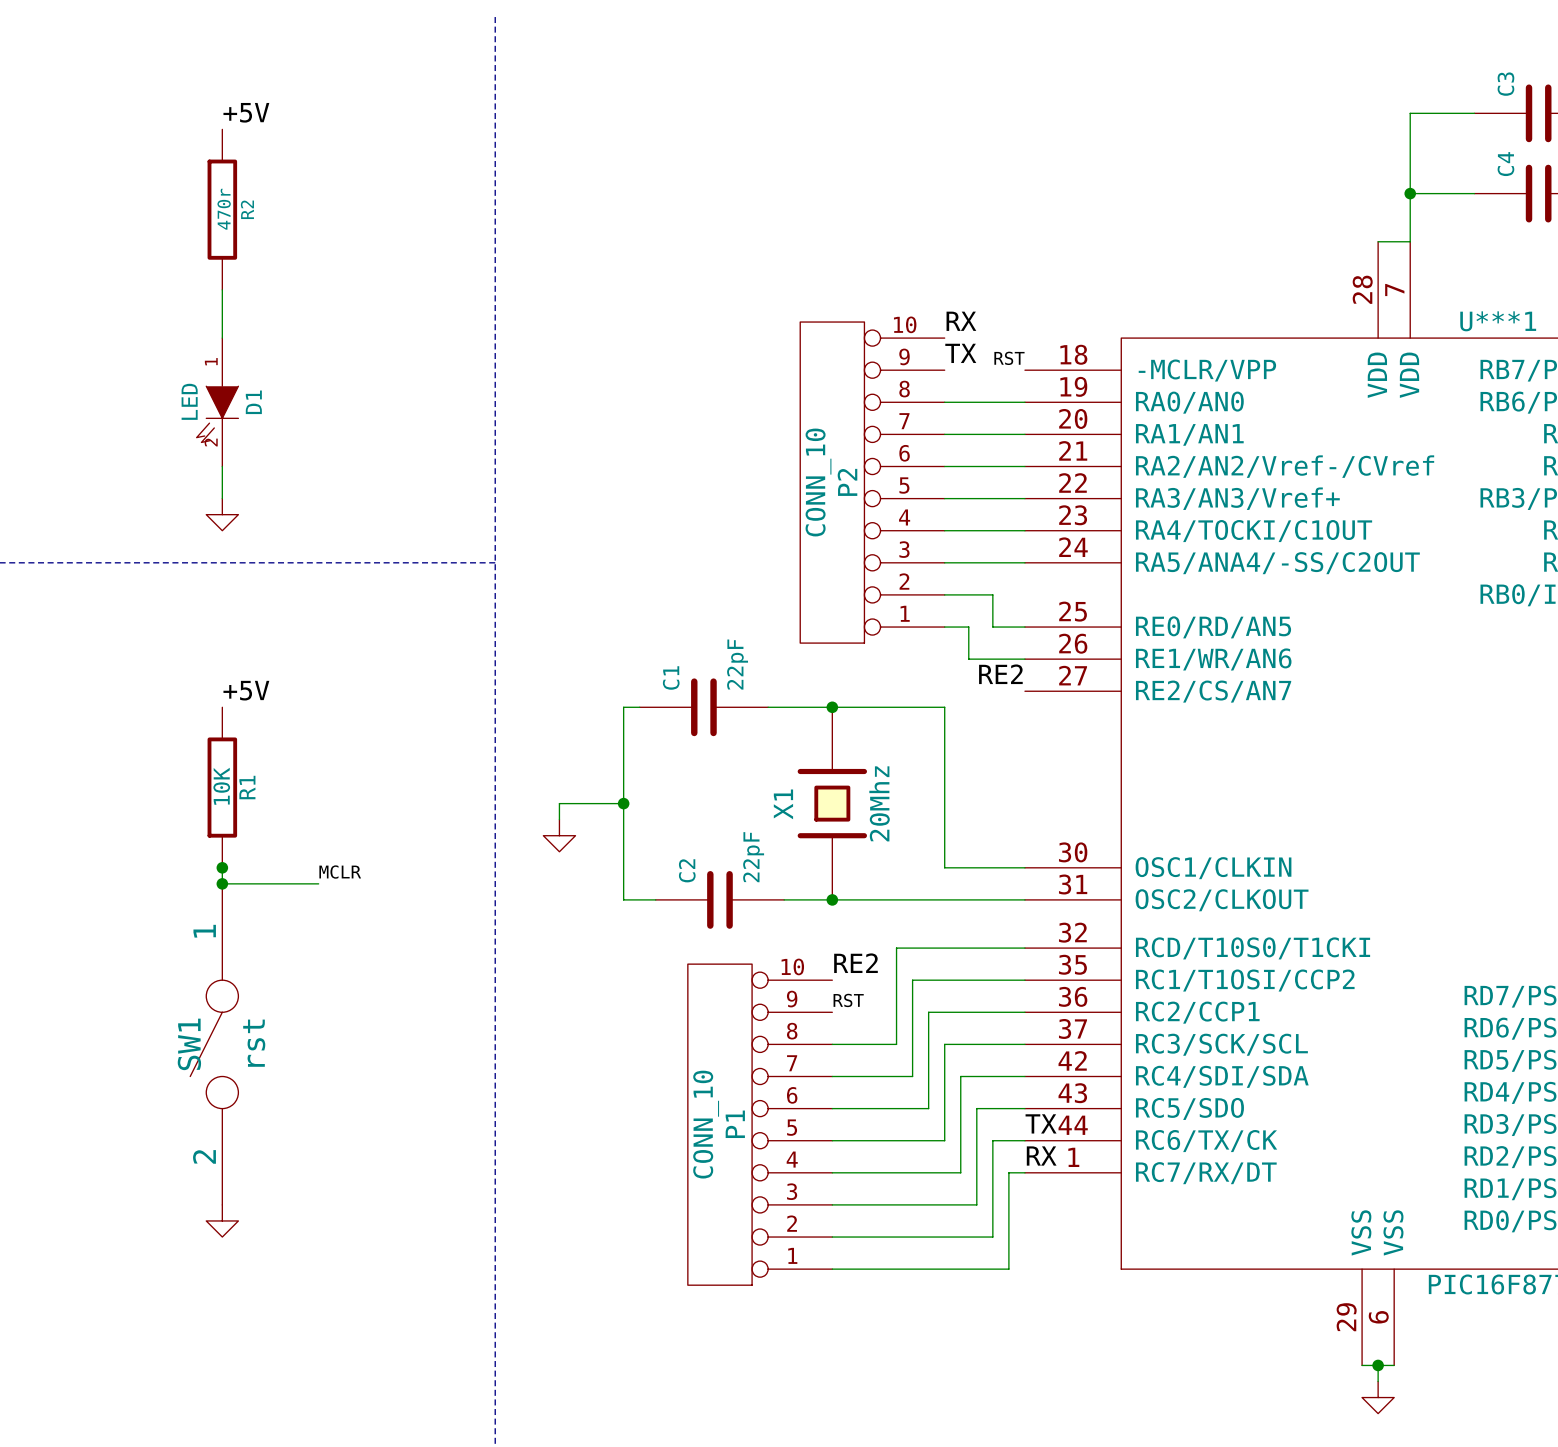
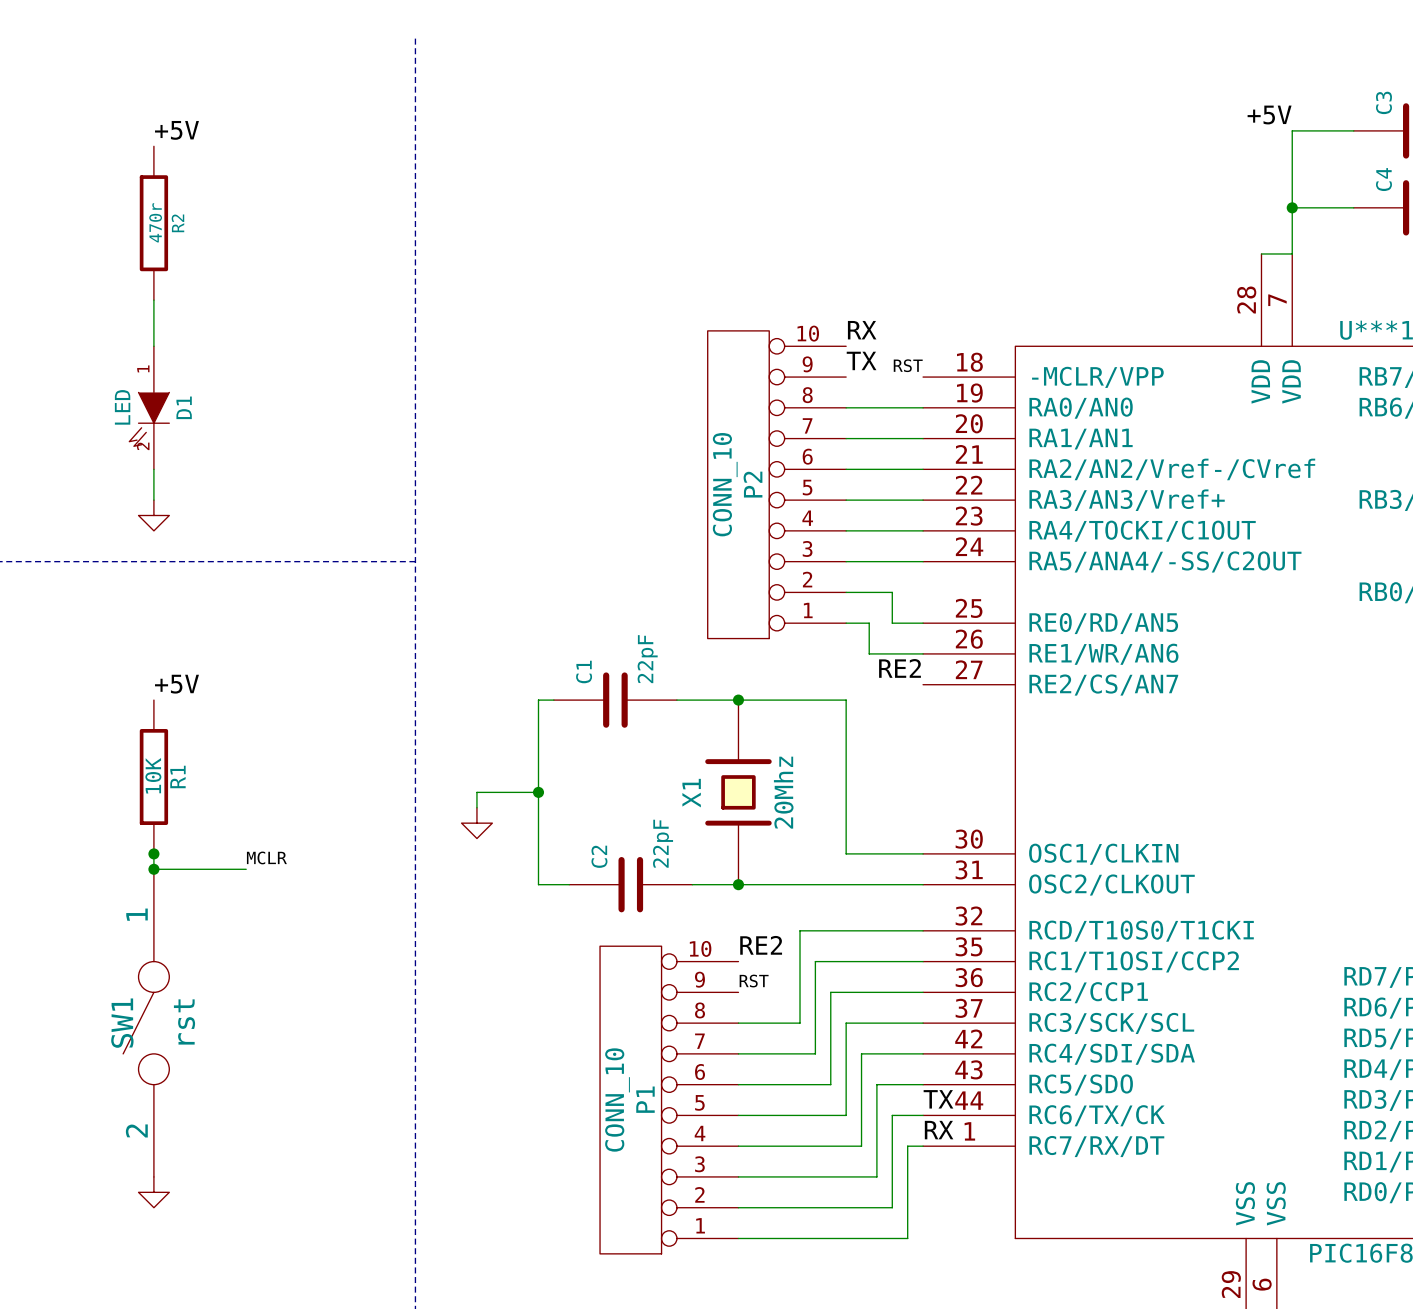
label: none -> +5V (1269, 115)

